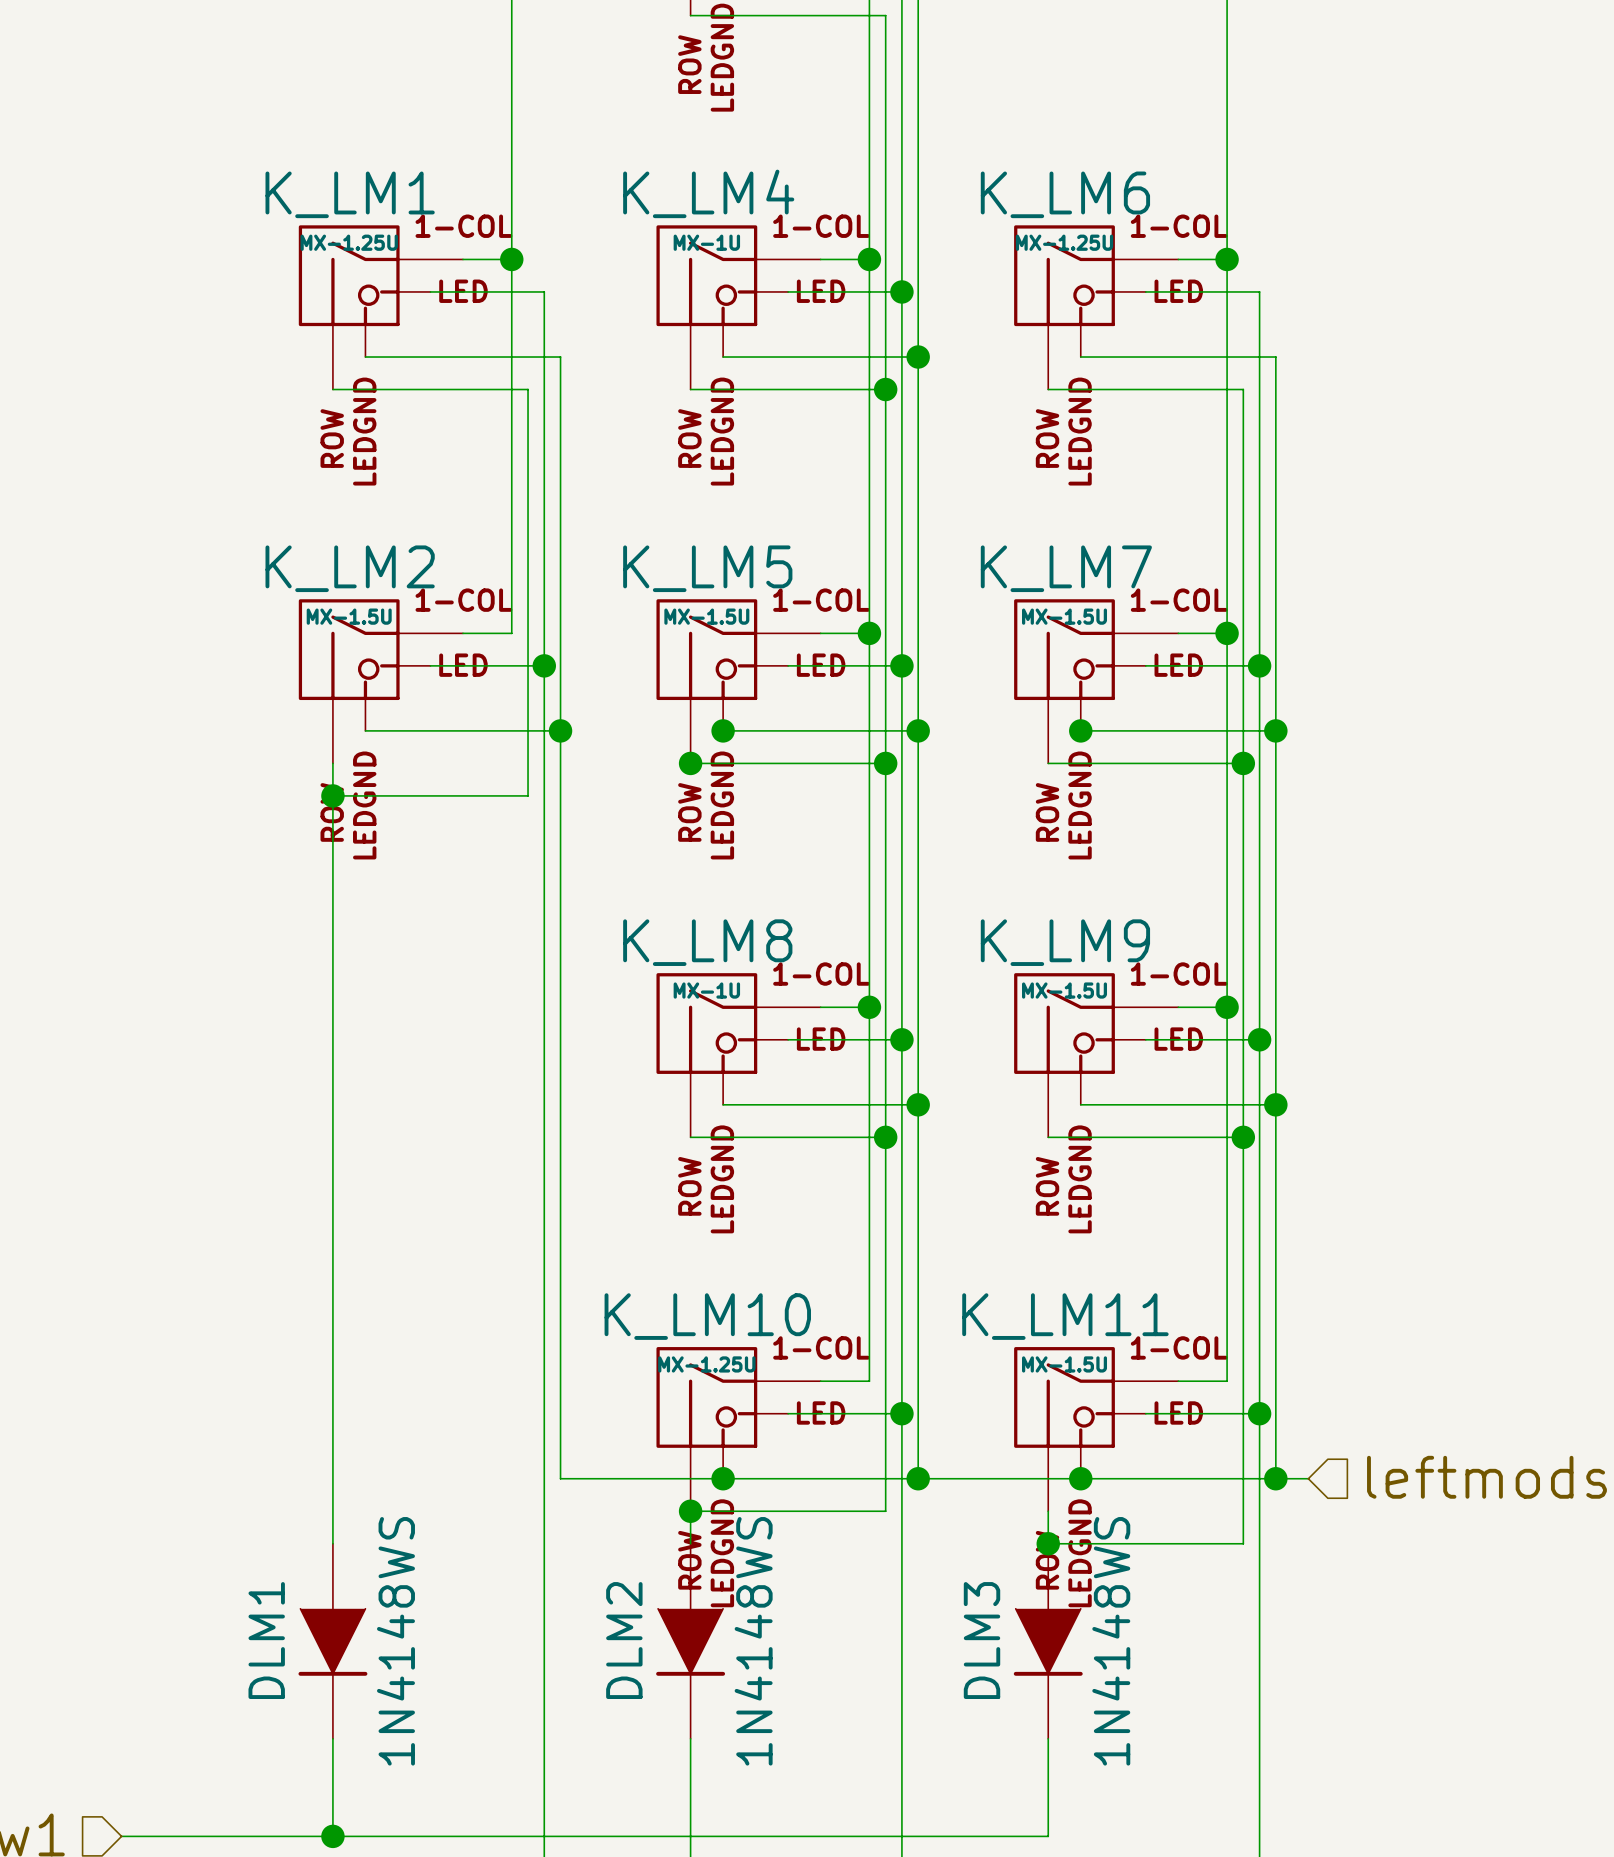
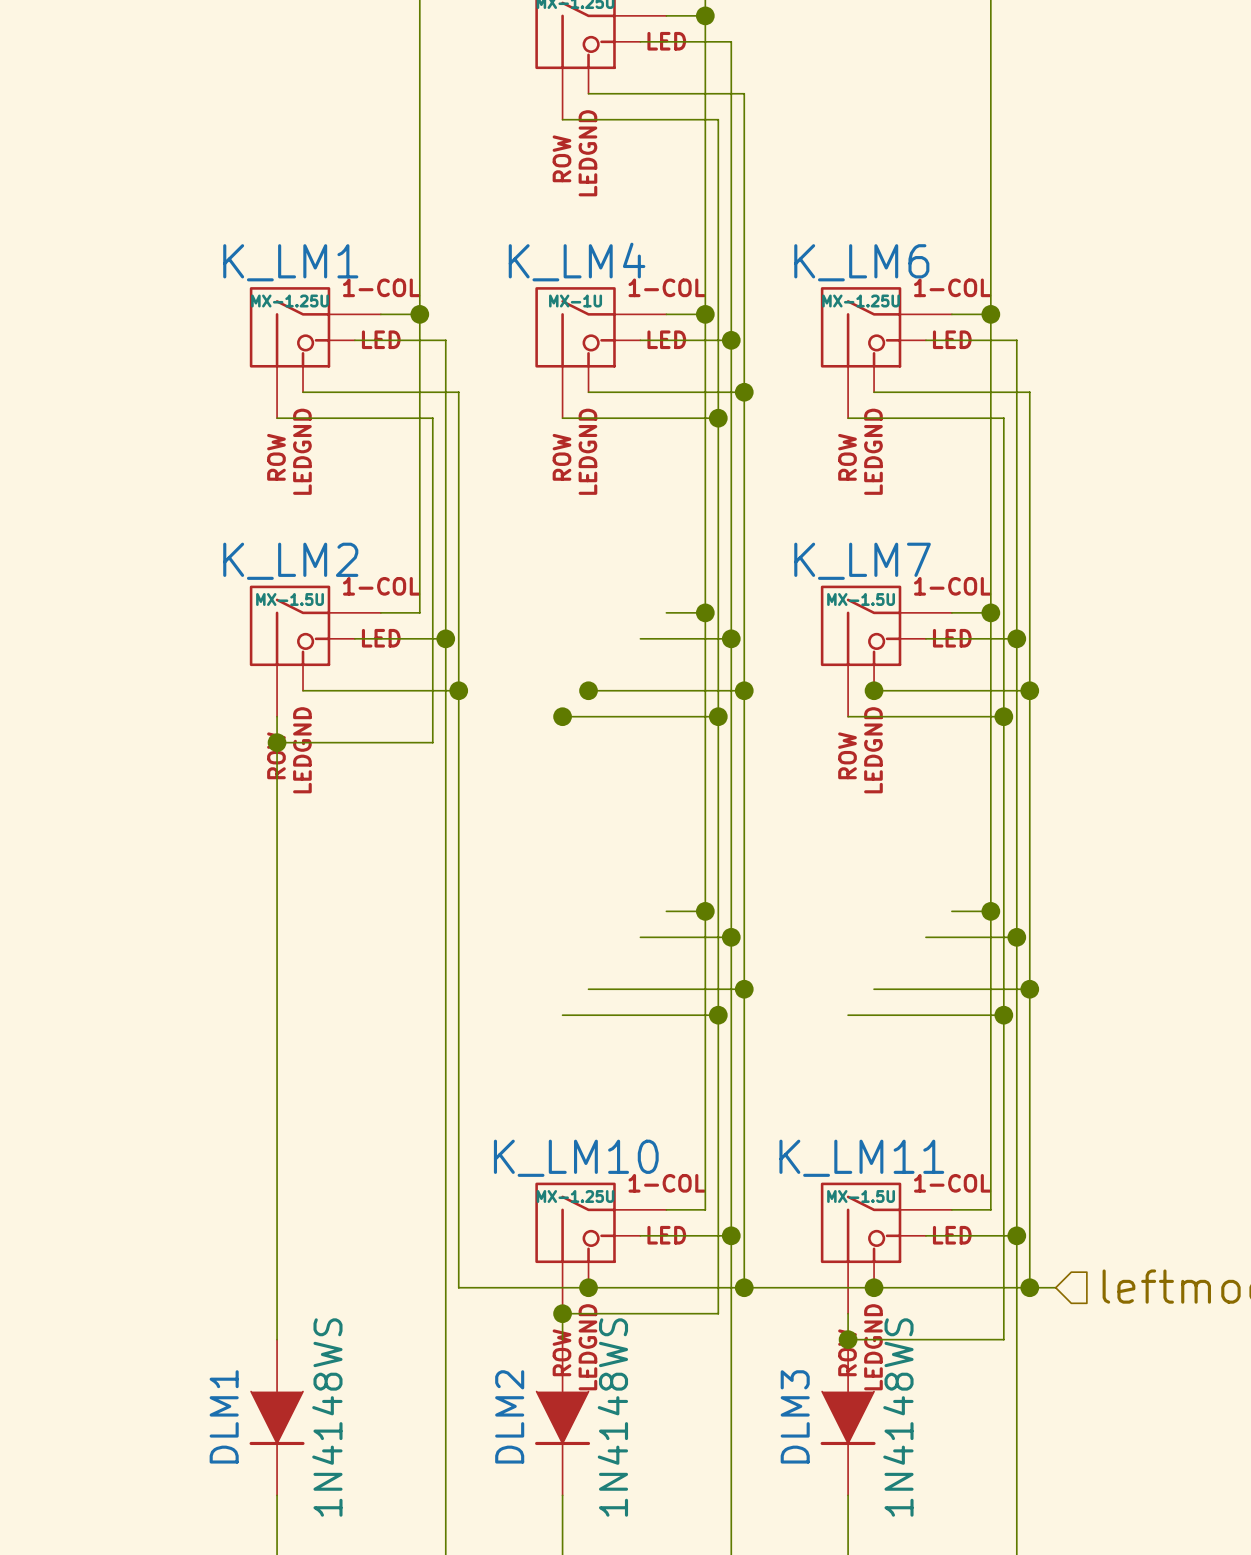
K_LM5: MX-1.5U (738, 681) -> none
K_LM8: MX-1U (738, 1055) -> none
K_LM9: MX-1.5U (1096, 1055) -> none

